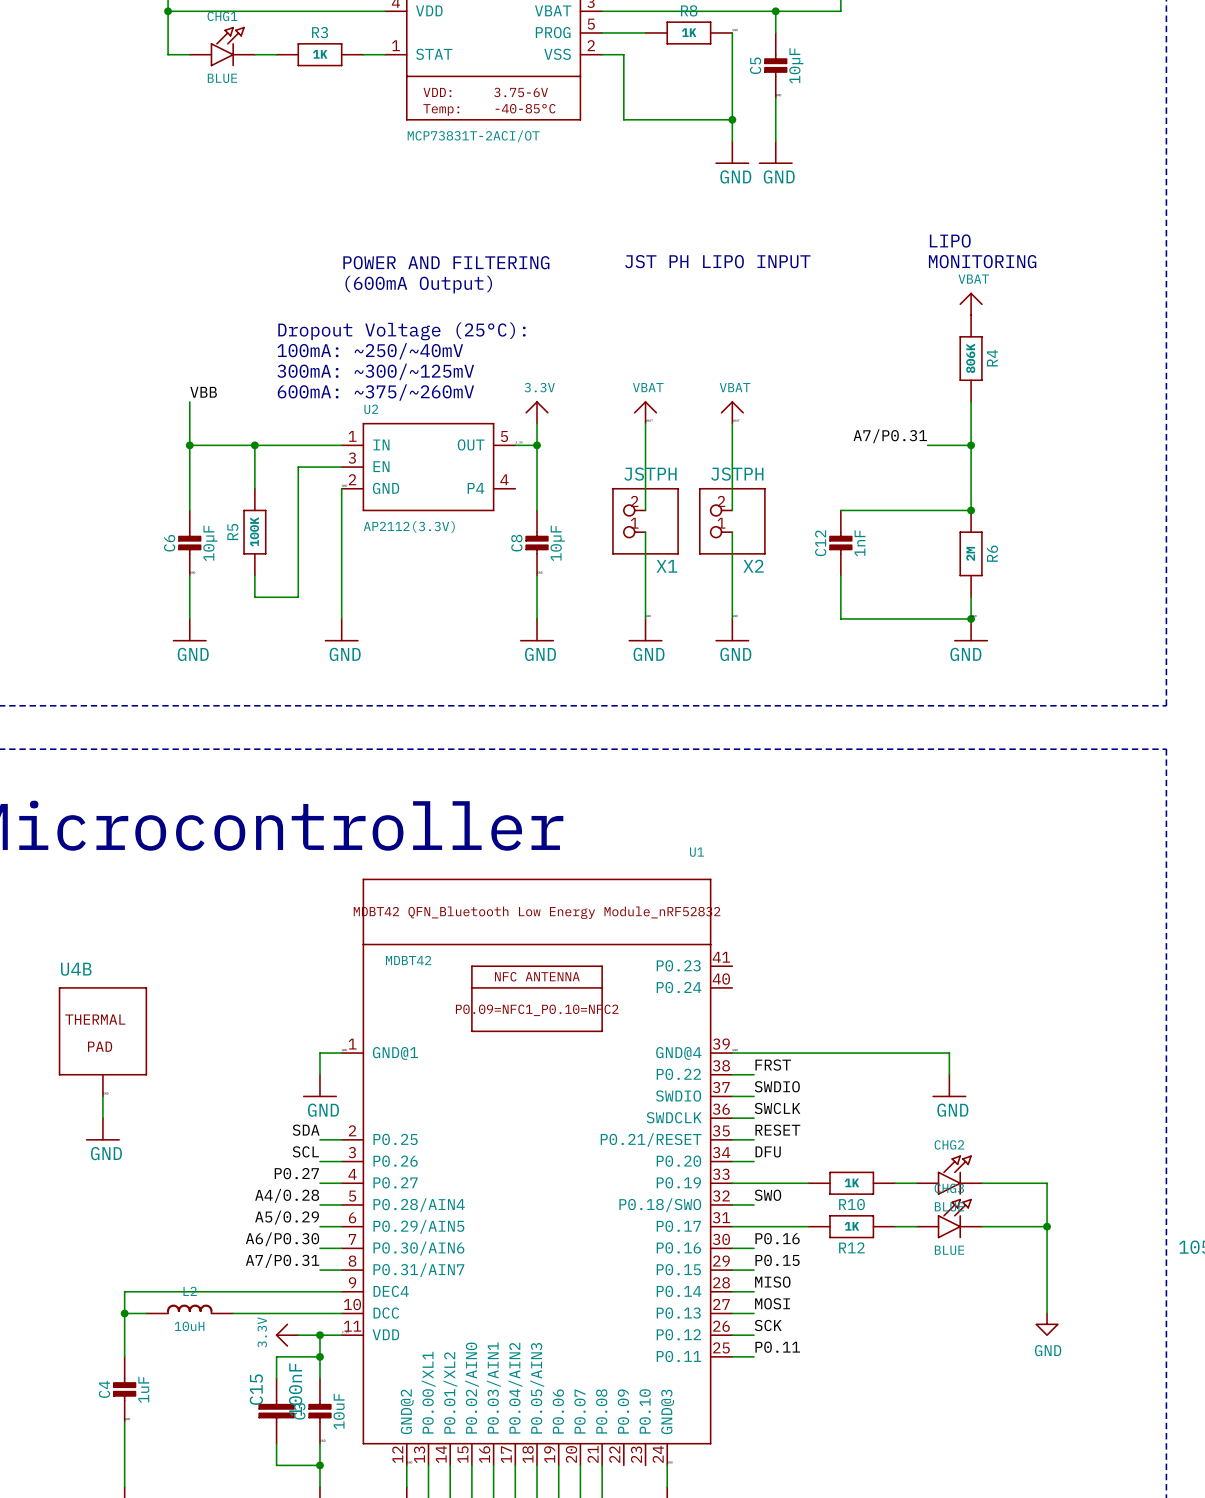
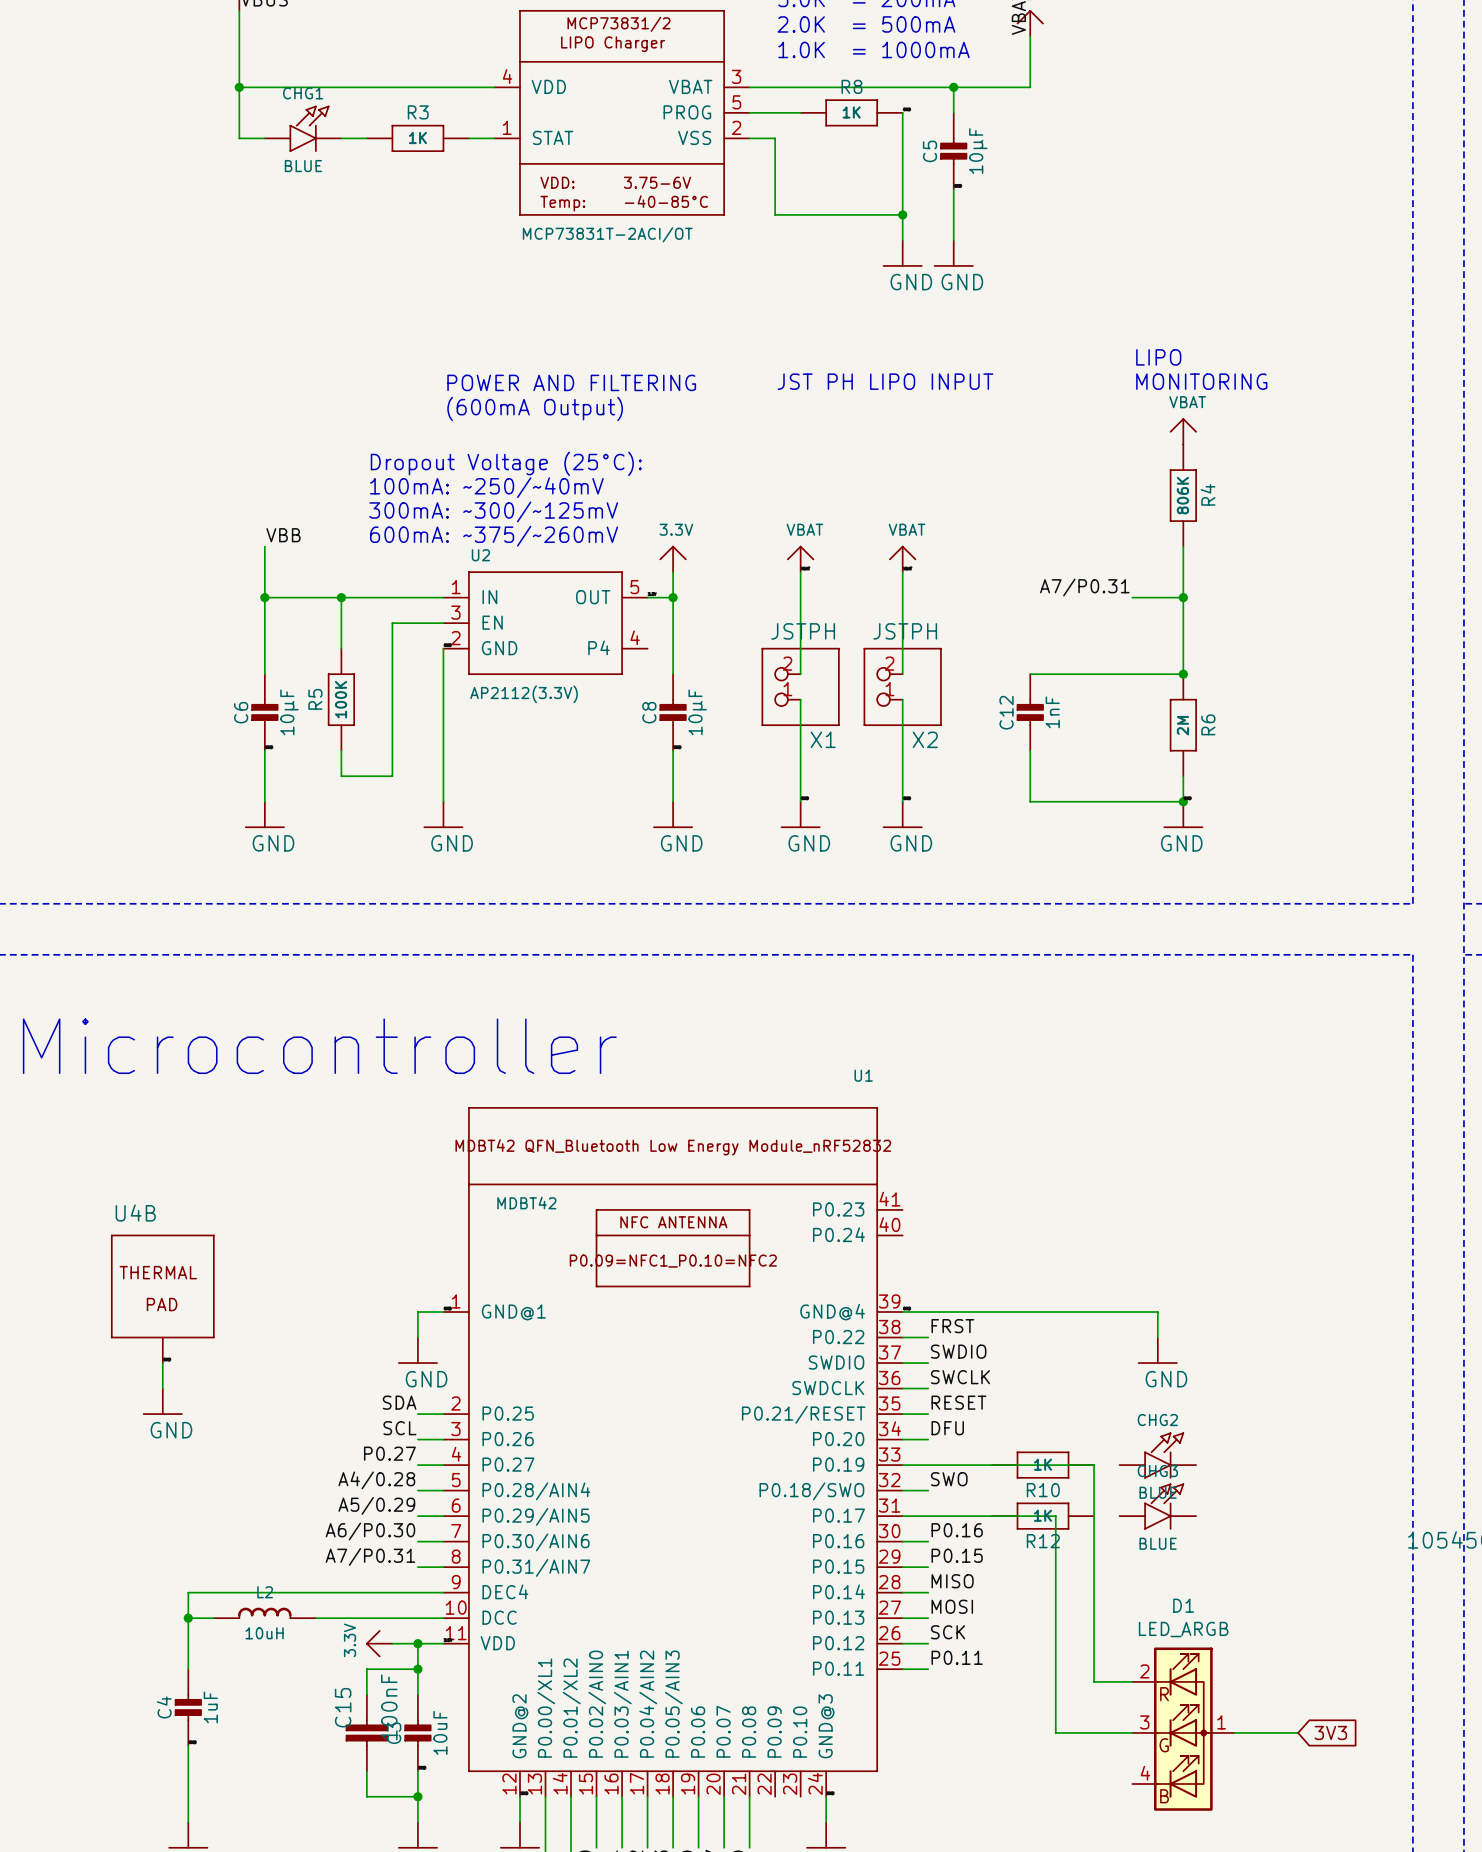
wire: none -> (991, 1465) (1094, 1465) (1094, 1681) (1132, 1681)
wire: (895, 1183) (916, 1183) -> none
wire: (981, 1183) (1047, 1183) (1047, 1313) -> none
wire: none -> (991, 1516) (1055, 1516) (1055, 1732) (1132, 1732)
wire: (895, 1226) (916, 1226) -> none
wire: (981, 1226) (1047, 1226) -> none
junction: (1047, 1226) -> none
power symbol: GND (1047, 1324) -> none
D1: none -> LED_ARGB (1183, 1729)
wire: none -> (1234, 1732) (1298, 1732)
global label: none -> 3V3 (1330, 1732)

